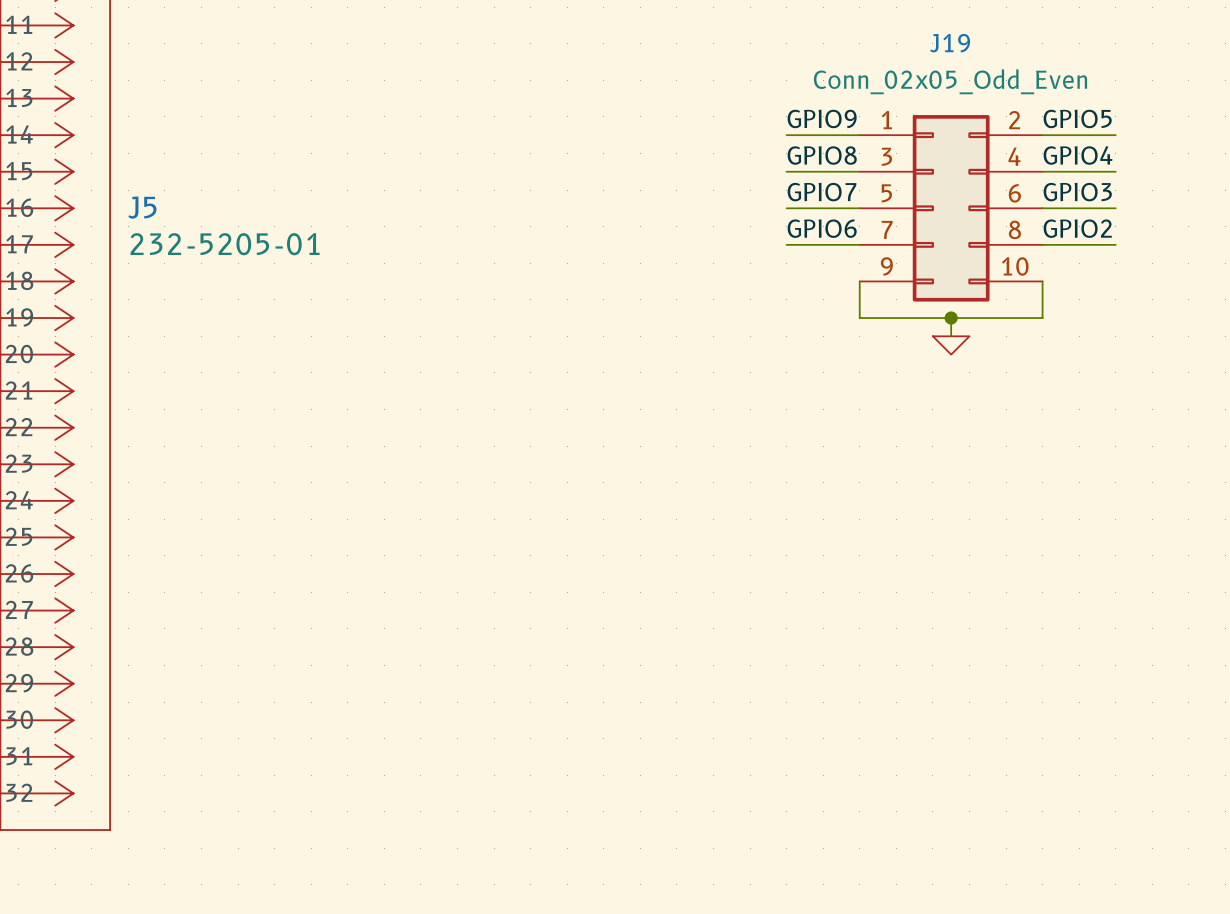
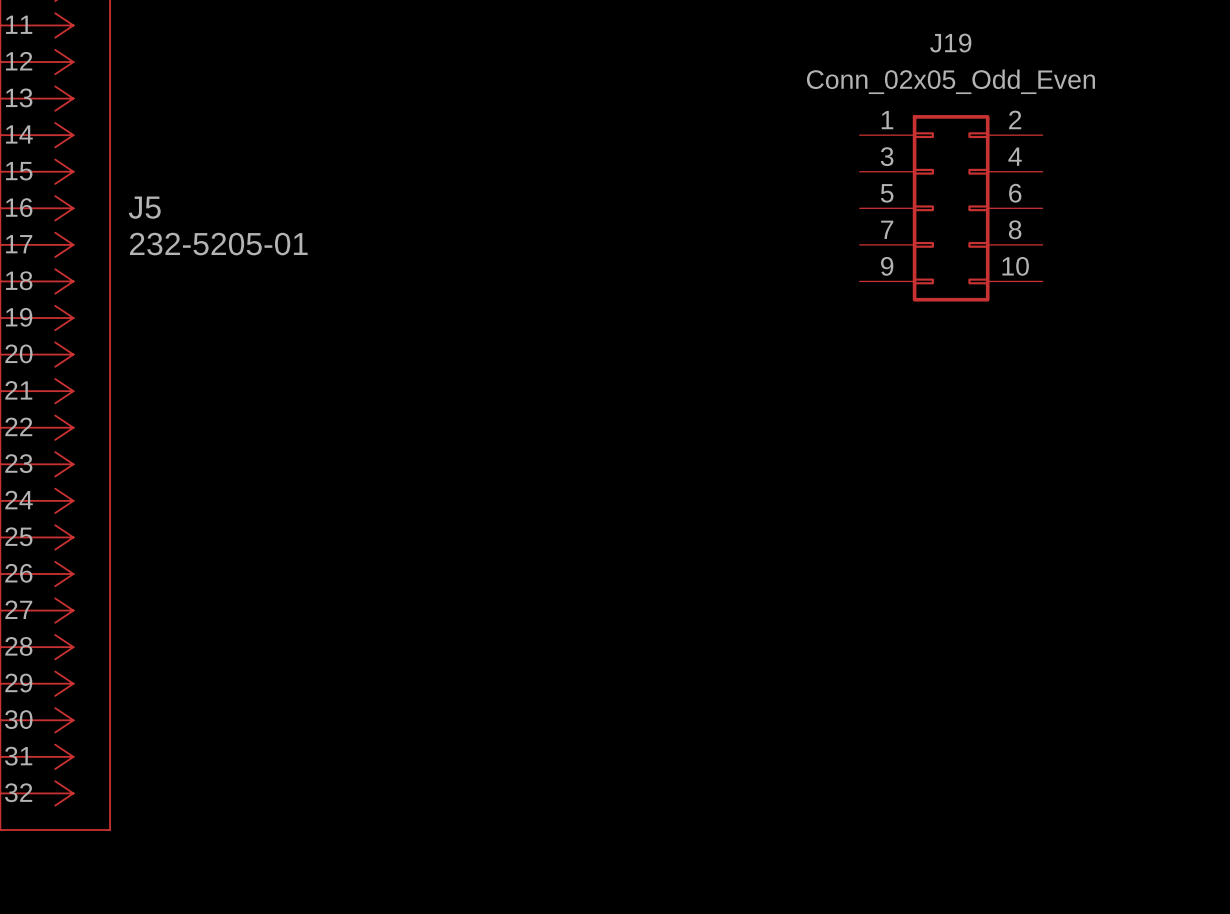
label: GPIO9 (822, 118) -> none
label: GPIO5 (1077, 118) -> none
wire: (786, 135) (859, 135) -> none
wire: (1042, 135) (1115, 135) -> none
label: GPIO8 (822, 155) -> none
label: GPIO4 (1078, 155) -> none
wire: (786, 171) (859, 171) -> none
wire: (1042, 171) (1115, 171) -> none
label: GPIO7 (822, 192) -> none
label: GPIO3 (1077, 192) -> none
wire: (786, 208) (859, 208) -> none
wire: (1042, 208) (1115, 208) -> none
label: GPIO6 (822, 228) -> none
label: GPIO2 (1077, 228) -> none
wire: (786, 244) (859, 244) -> none
wire: (1042, 244) (1115, 244) -> none
wire: (859, 281) (859, 318) (1042, 318) (1042, 281) -> none
wire: (951, 318) (951, 336) -> none
junction: (951, 318) -> none
power symbol: (951, 345) -> none

